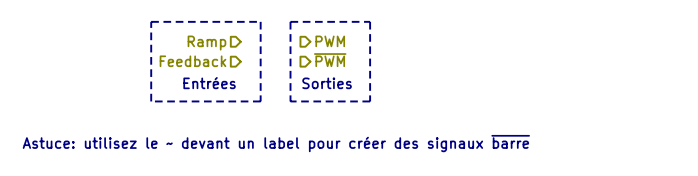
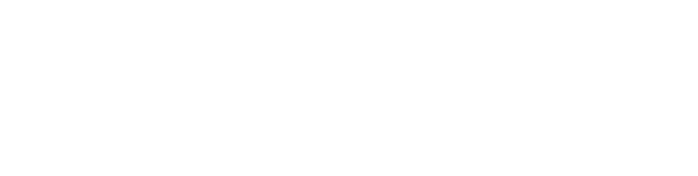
line: (151, 21) (260, 21) (260, 101) (151, 101) (151, 21) -> none
line: (290, 21) (370, 21) (370, 101) (290, 101) (290, 21) -> none
hierarchical label: PWM (330, 41) -> none
hierarchical label: Ramp (206, 43) -> none
hierarchical label: ~{PWM} (330, 60) -> none
hierarchical label: Feedback (192, 61) -> none
text: Entrées (209, 83) -> none
text: Sorties (327, 83) -> none
text: Astuce: utilisez le ~ devant un label pour créer des signaux ~{barre} (276, 143) -> none

